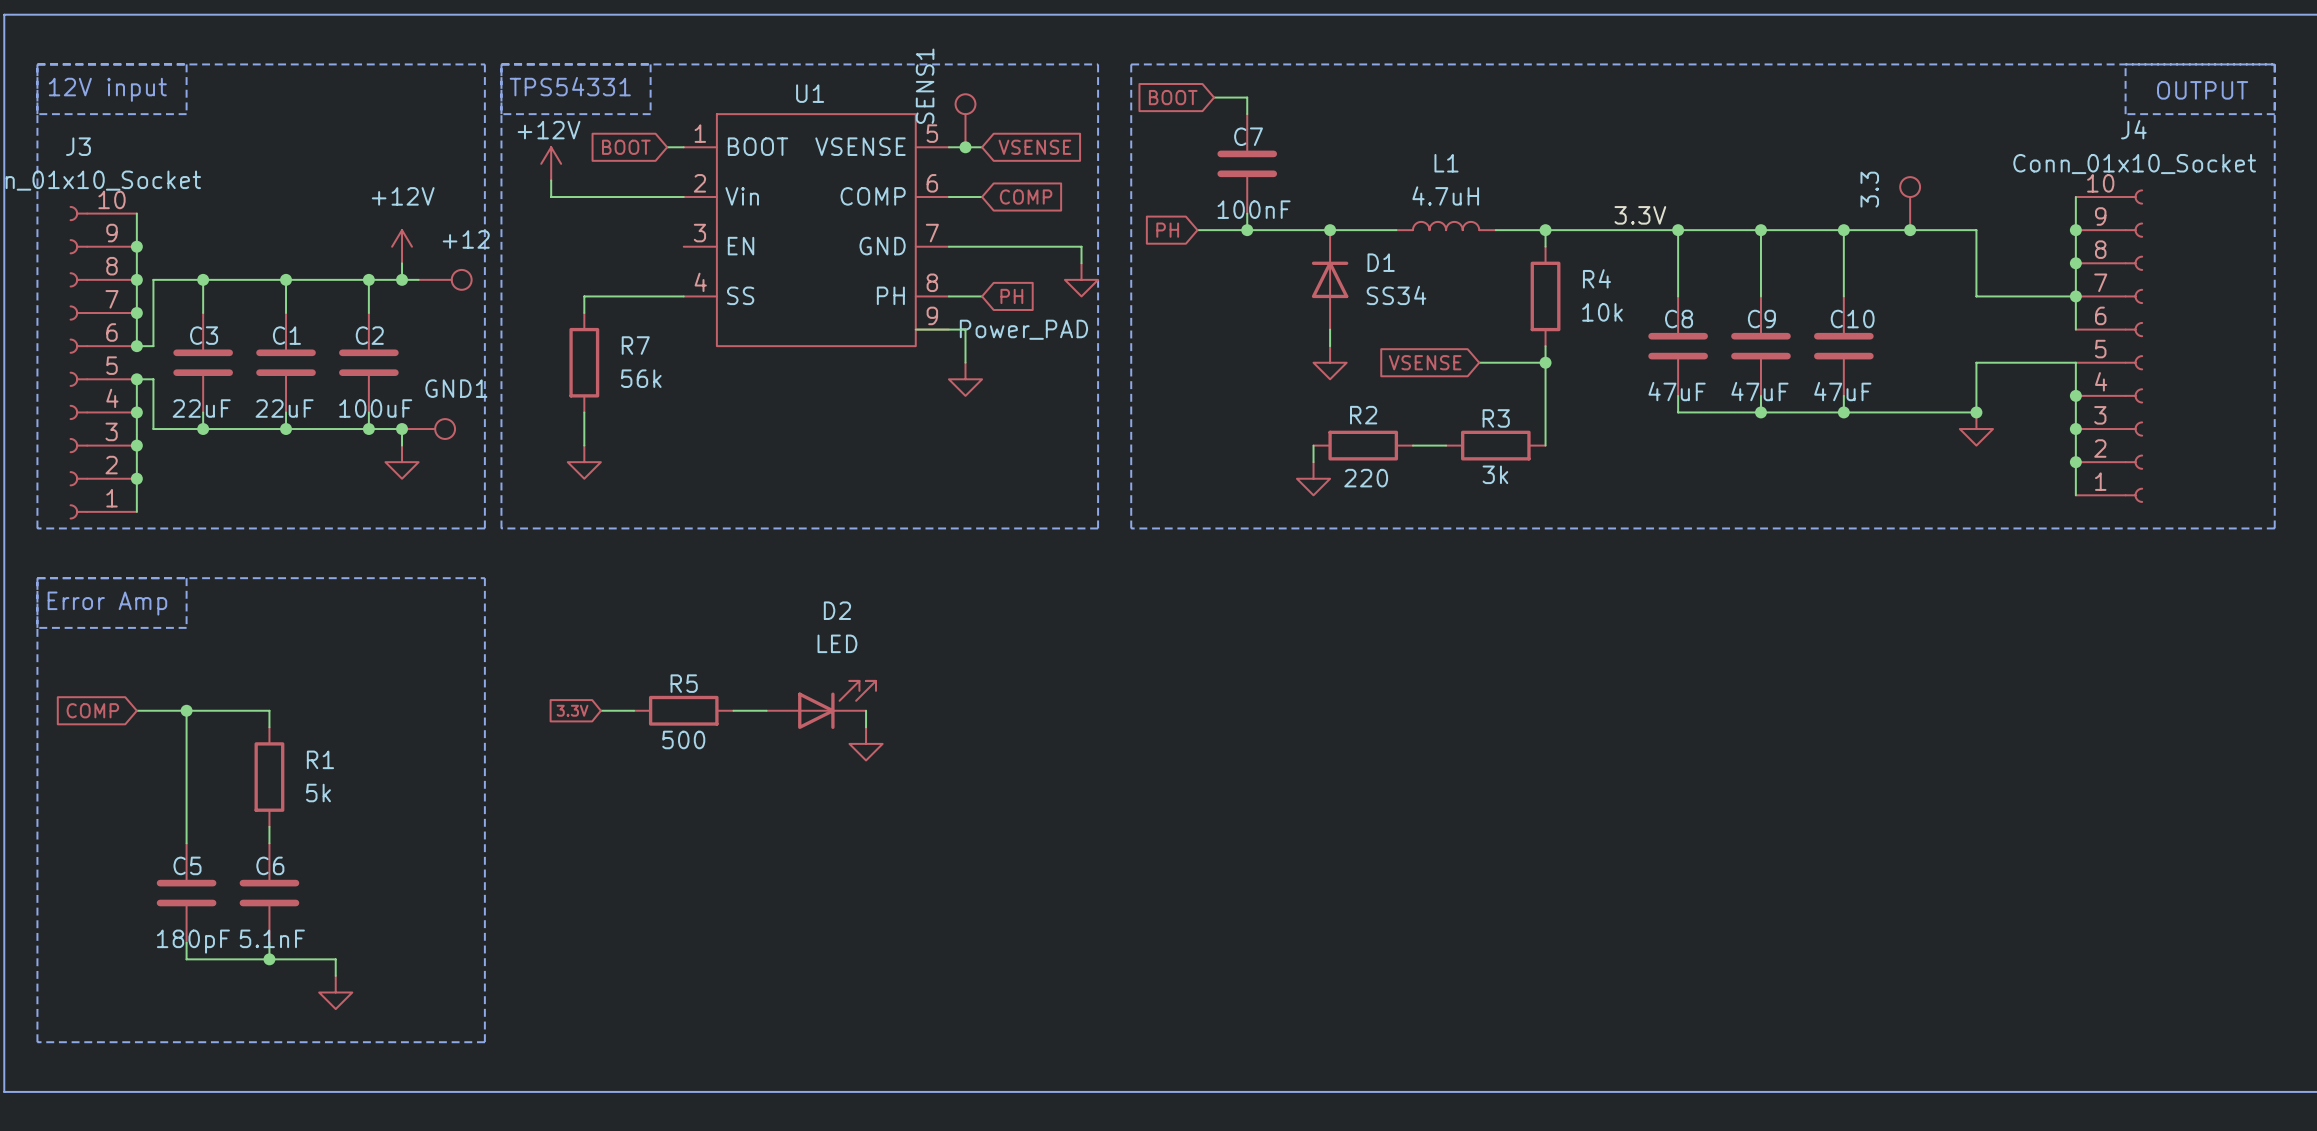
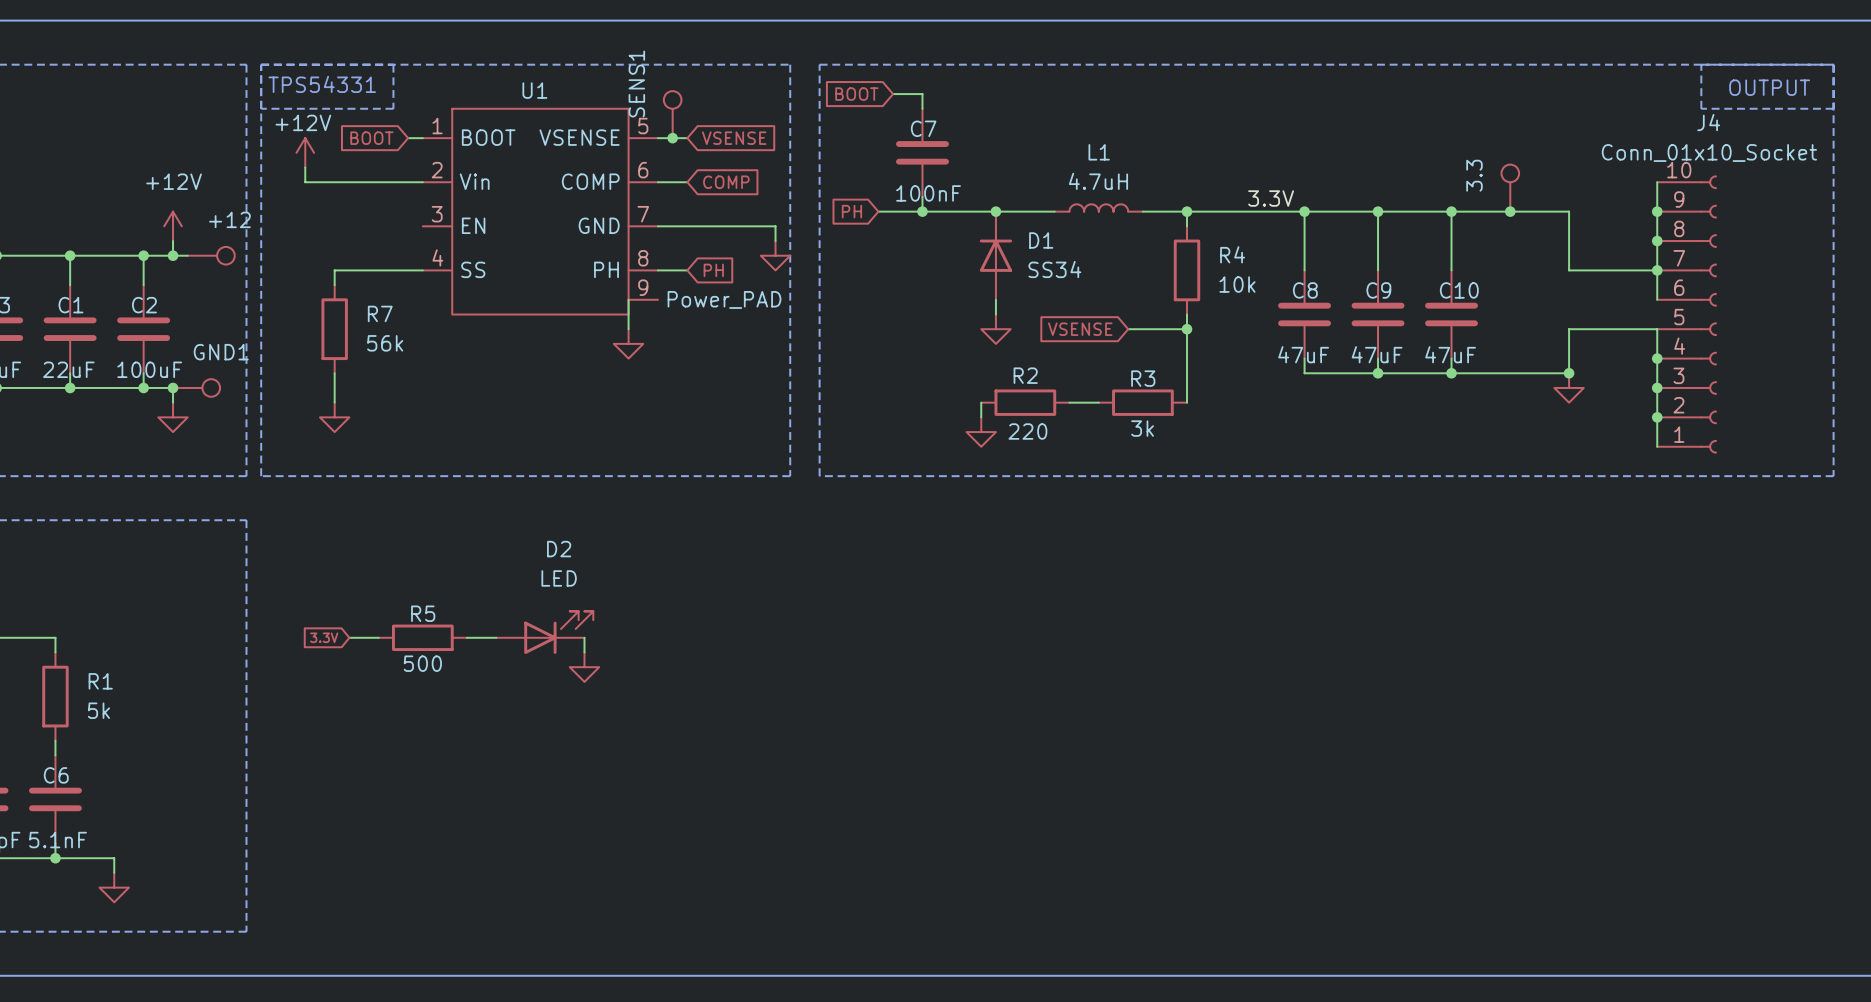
wire: (915, 329) (965, 329) (965, 362) -> (628, 299) (628, 329)
power symbol position: (965, 379) -> (628, 343)

